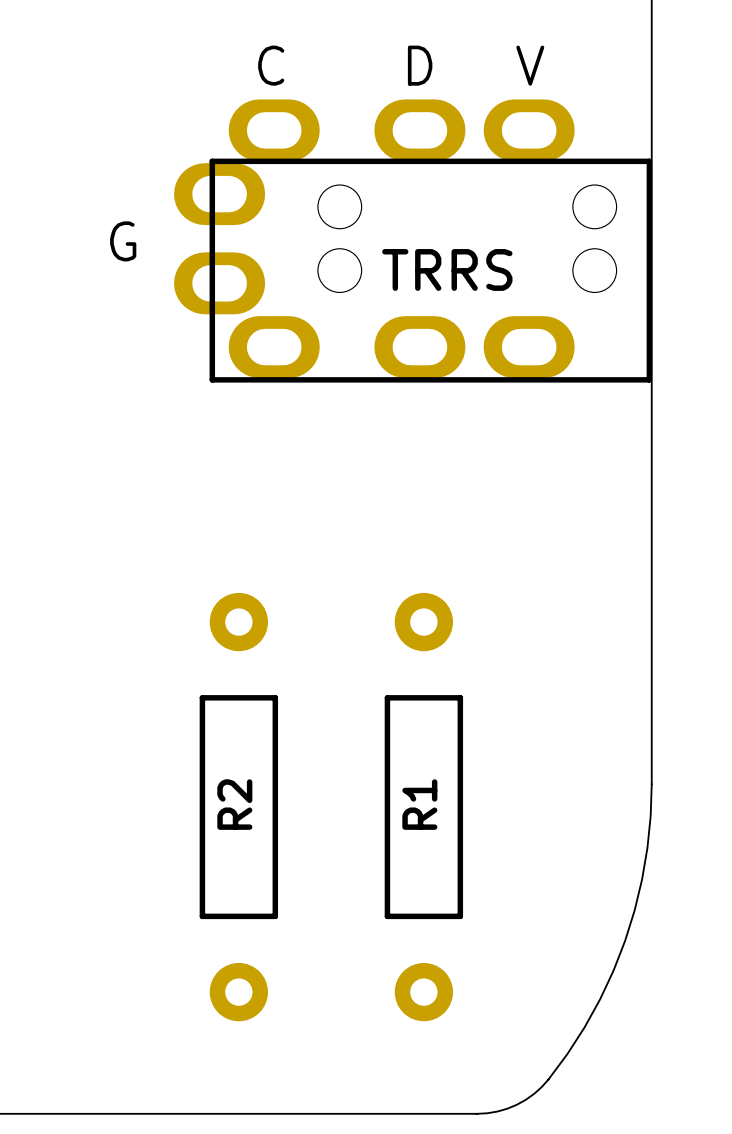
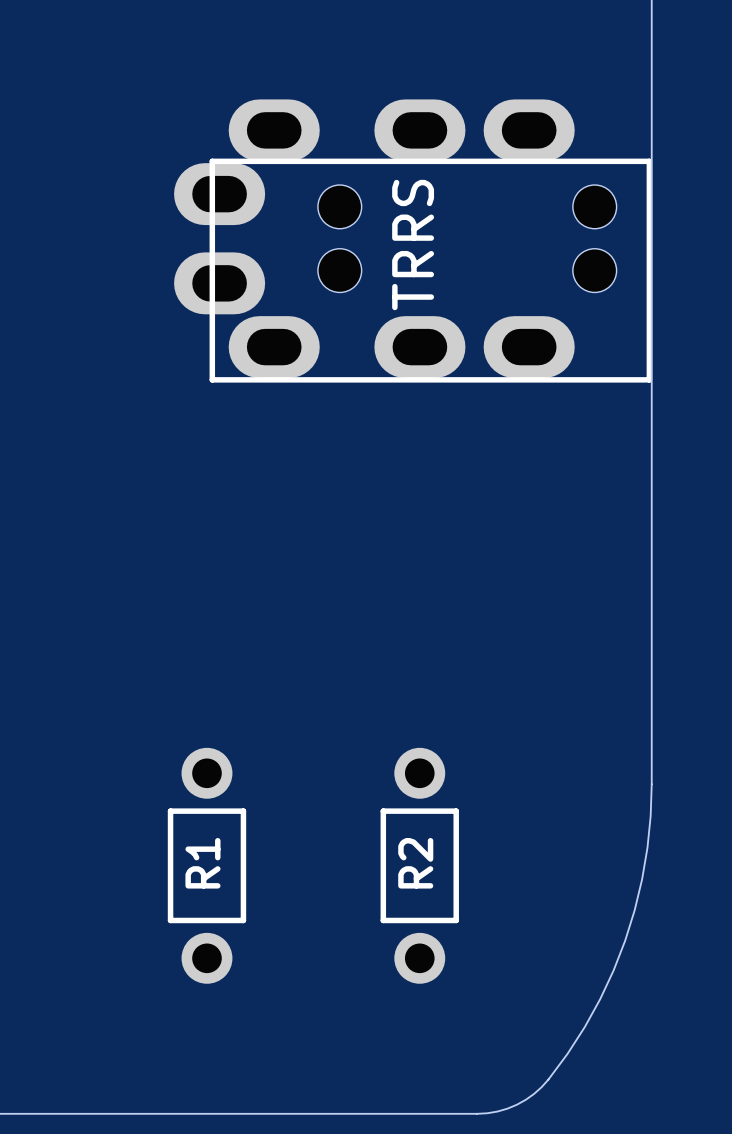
text: C (271, 65) -> none
text: D (420, 65) -> none
text: V (530, 65) -> none
text: G (123, 241) -> none
part text rotation: 0° (447, 269) -> 90° counterclockwise (413, 245)
R2 footprint: [199, 592, 279, 1022] -> [380, 747, 459, 984]
R1 footprint: [384, 592, 464, 1022] -> [167, 747, 247, 984]

